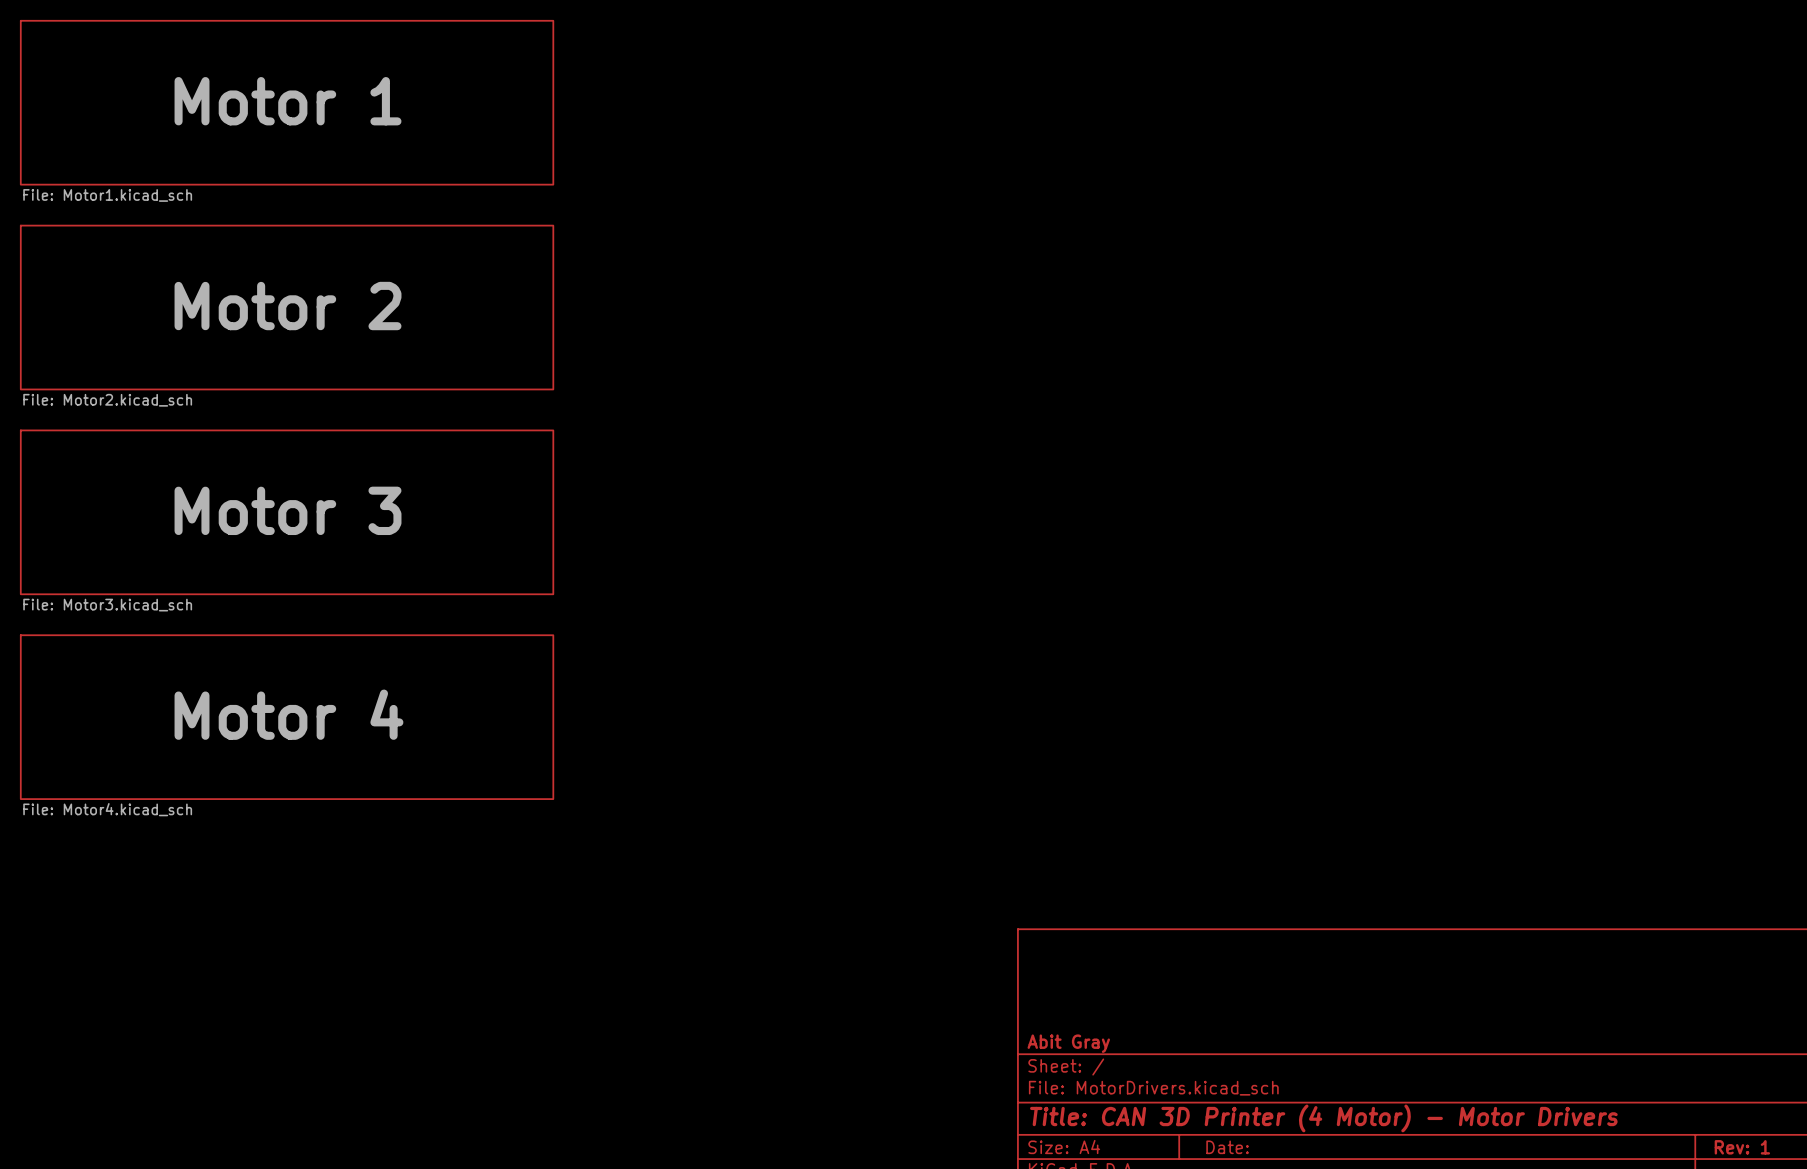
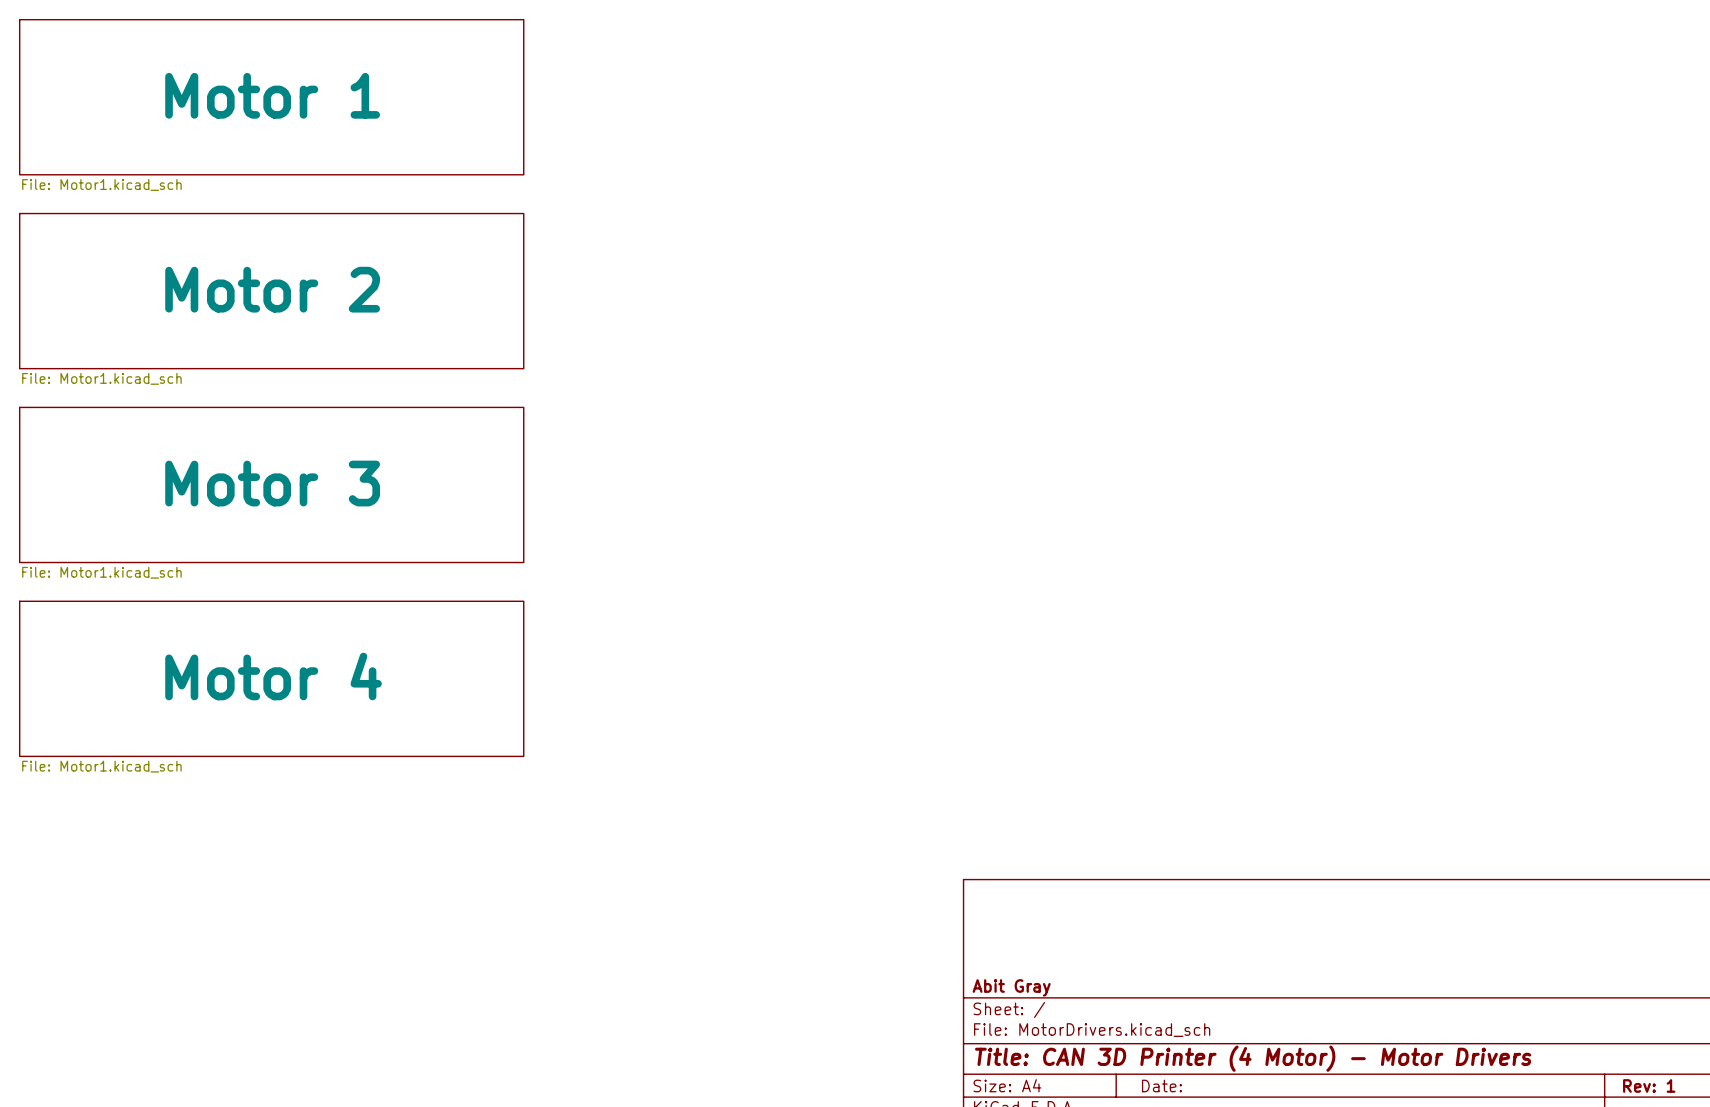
sheet Motor 2 value: File: Motor2.kicad_sch (107, 400) -> File: Motor1.kicad_sch (101, 378)
sheet Motor 3 value: File: Motor3.kicad_sch (107, 605) -> File: Motor1.kicad_sch (101, 572)
sheet Motor 4 value: File: Motor4.kicad_sch (107, 809) -> File: Motor1.kicad_sch (101, 766)

